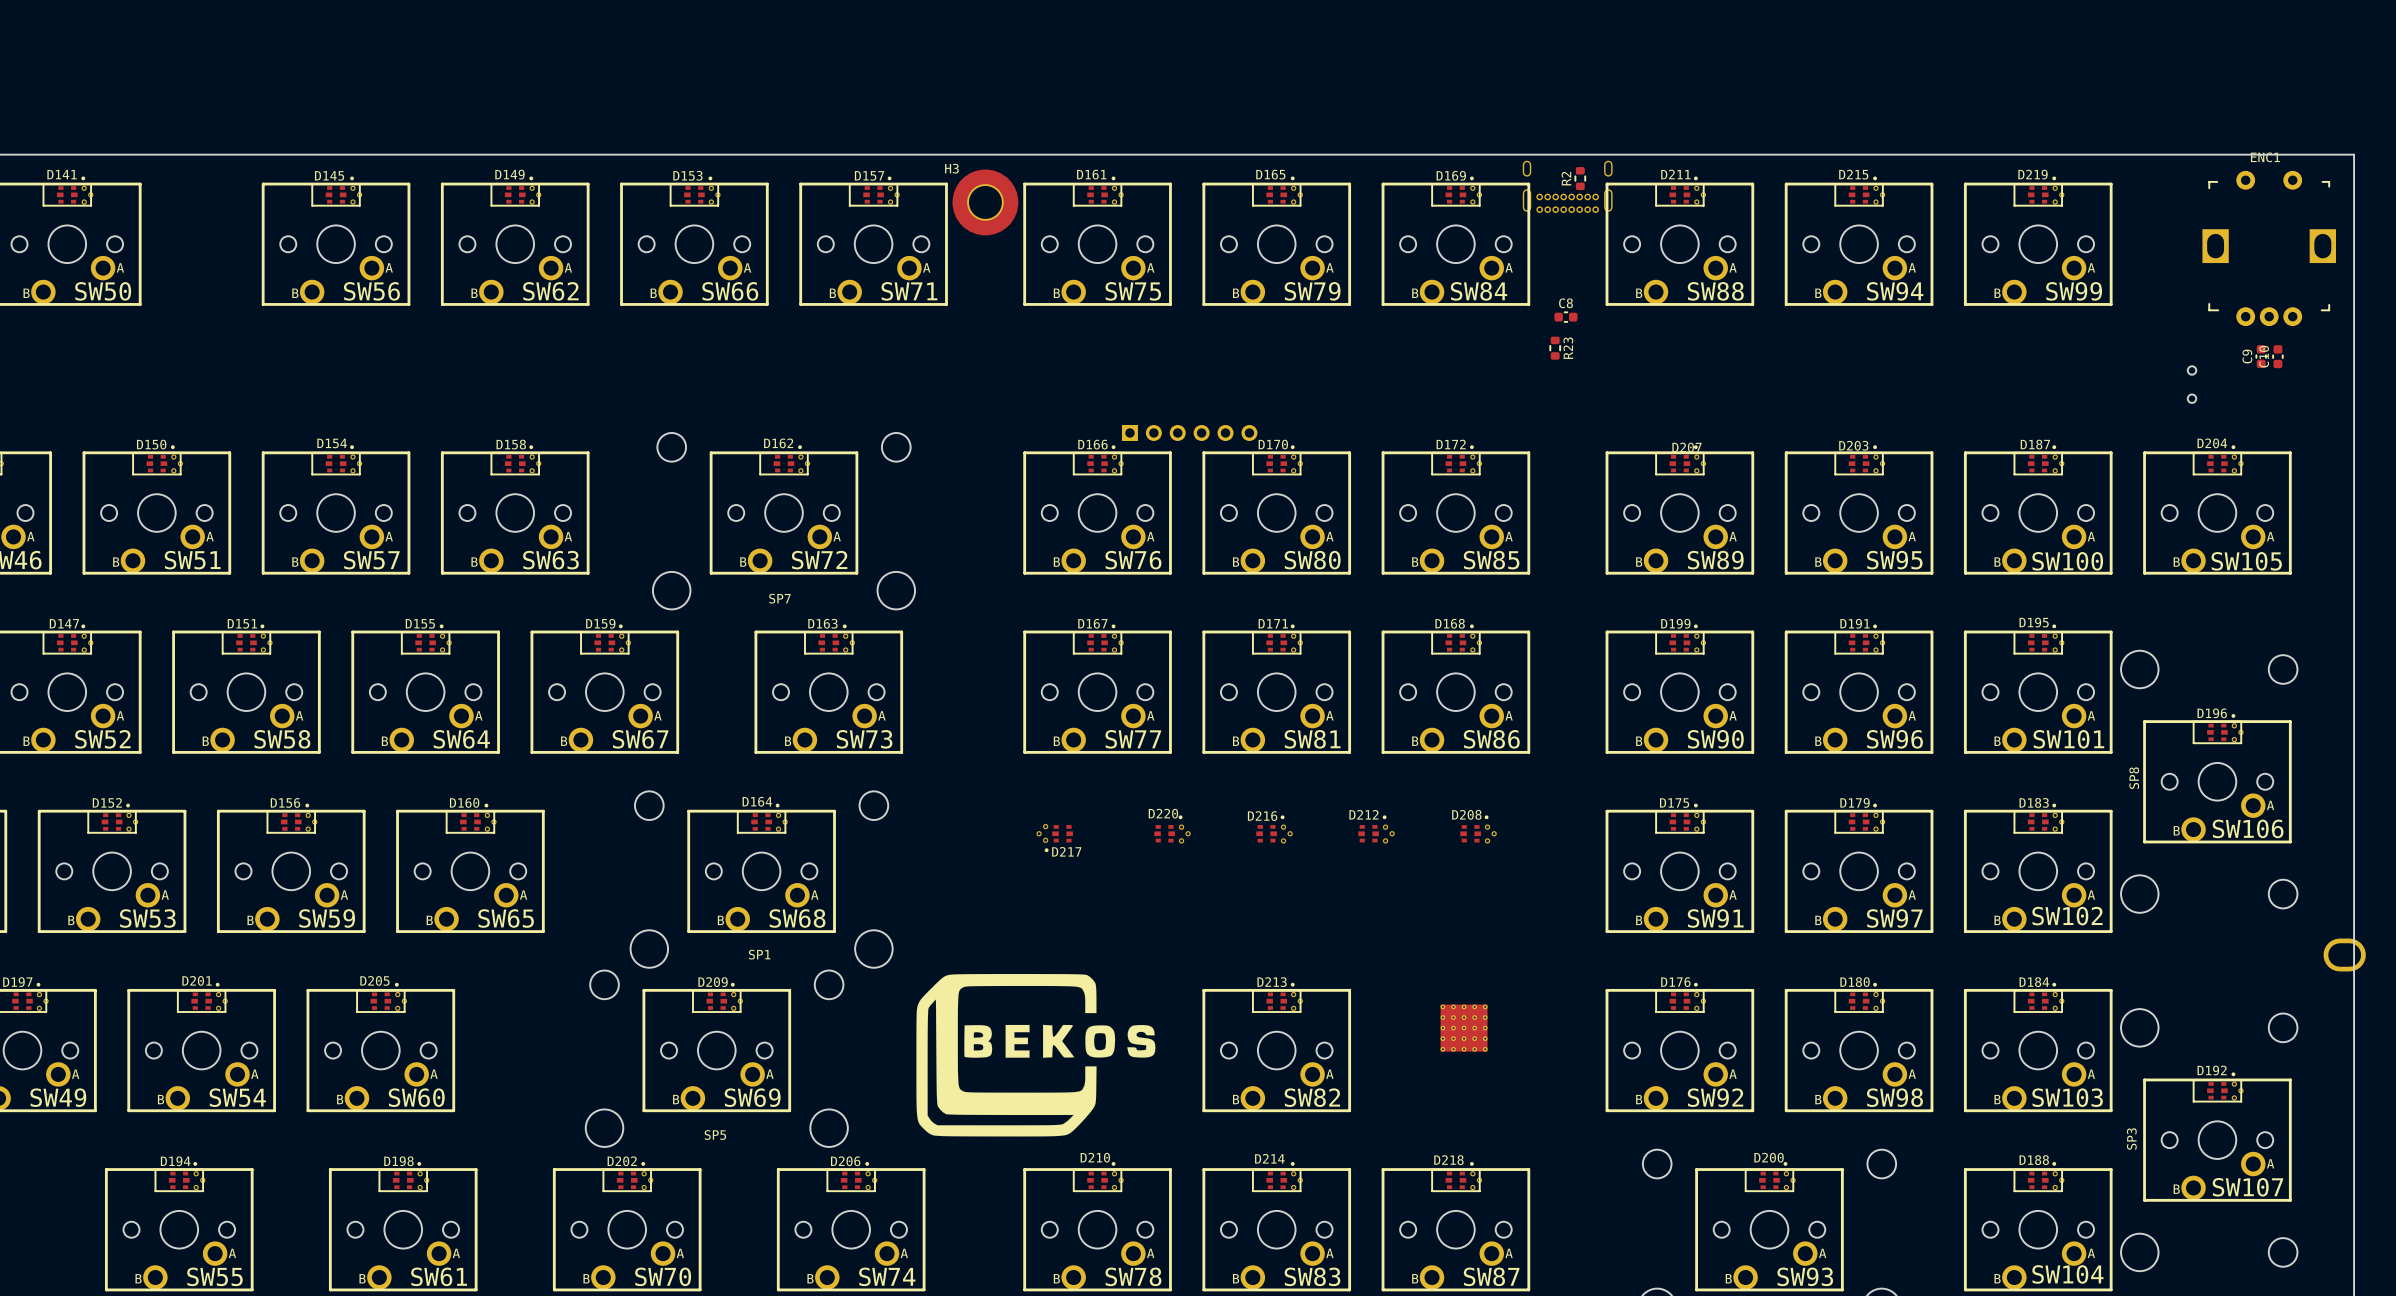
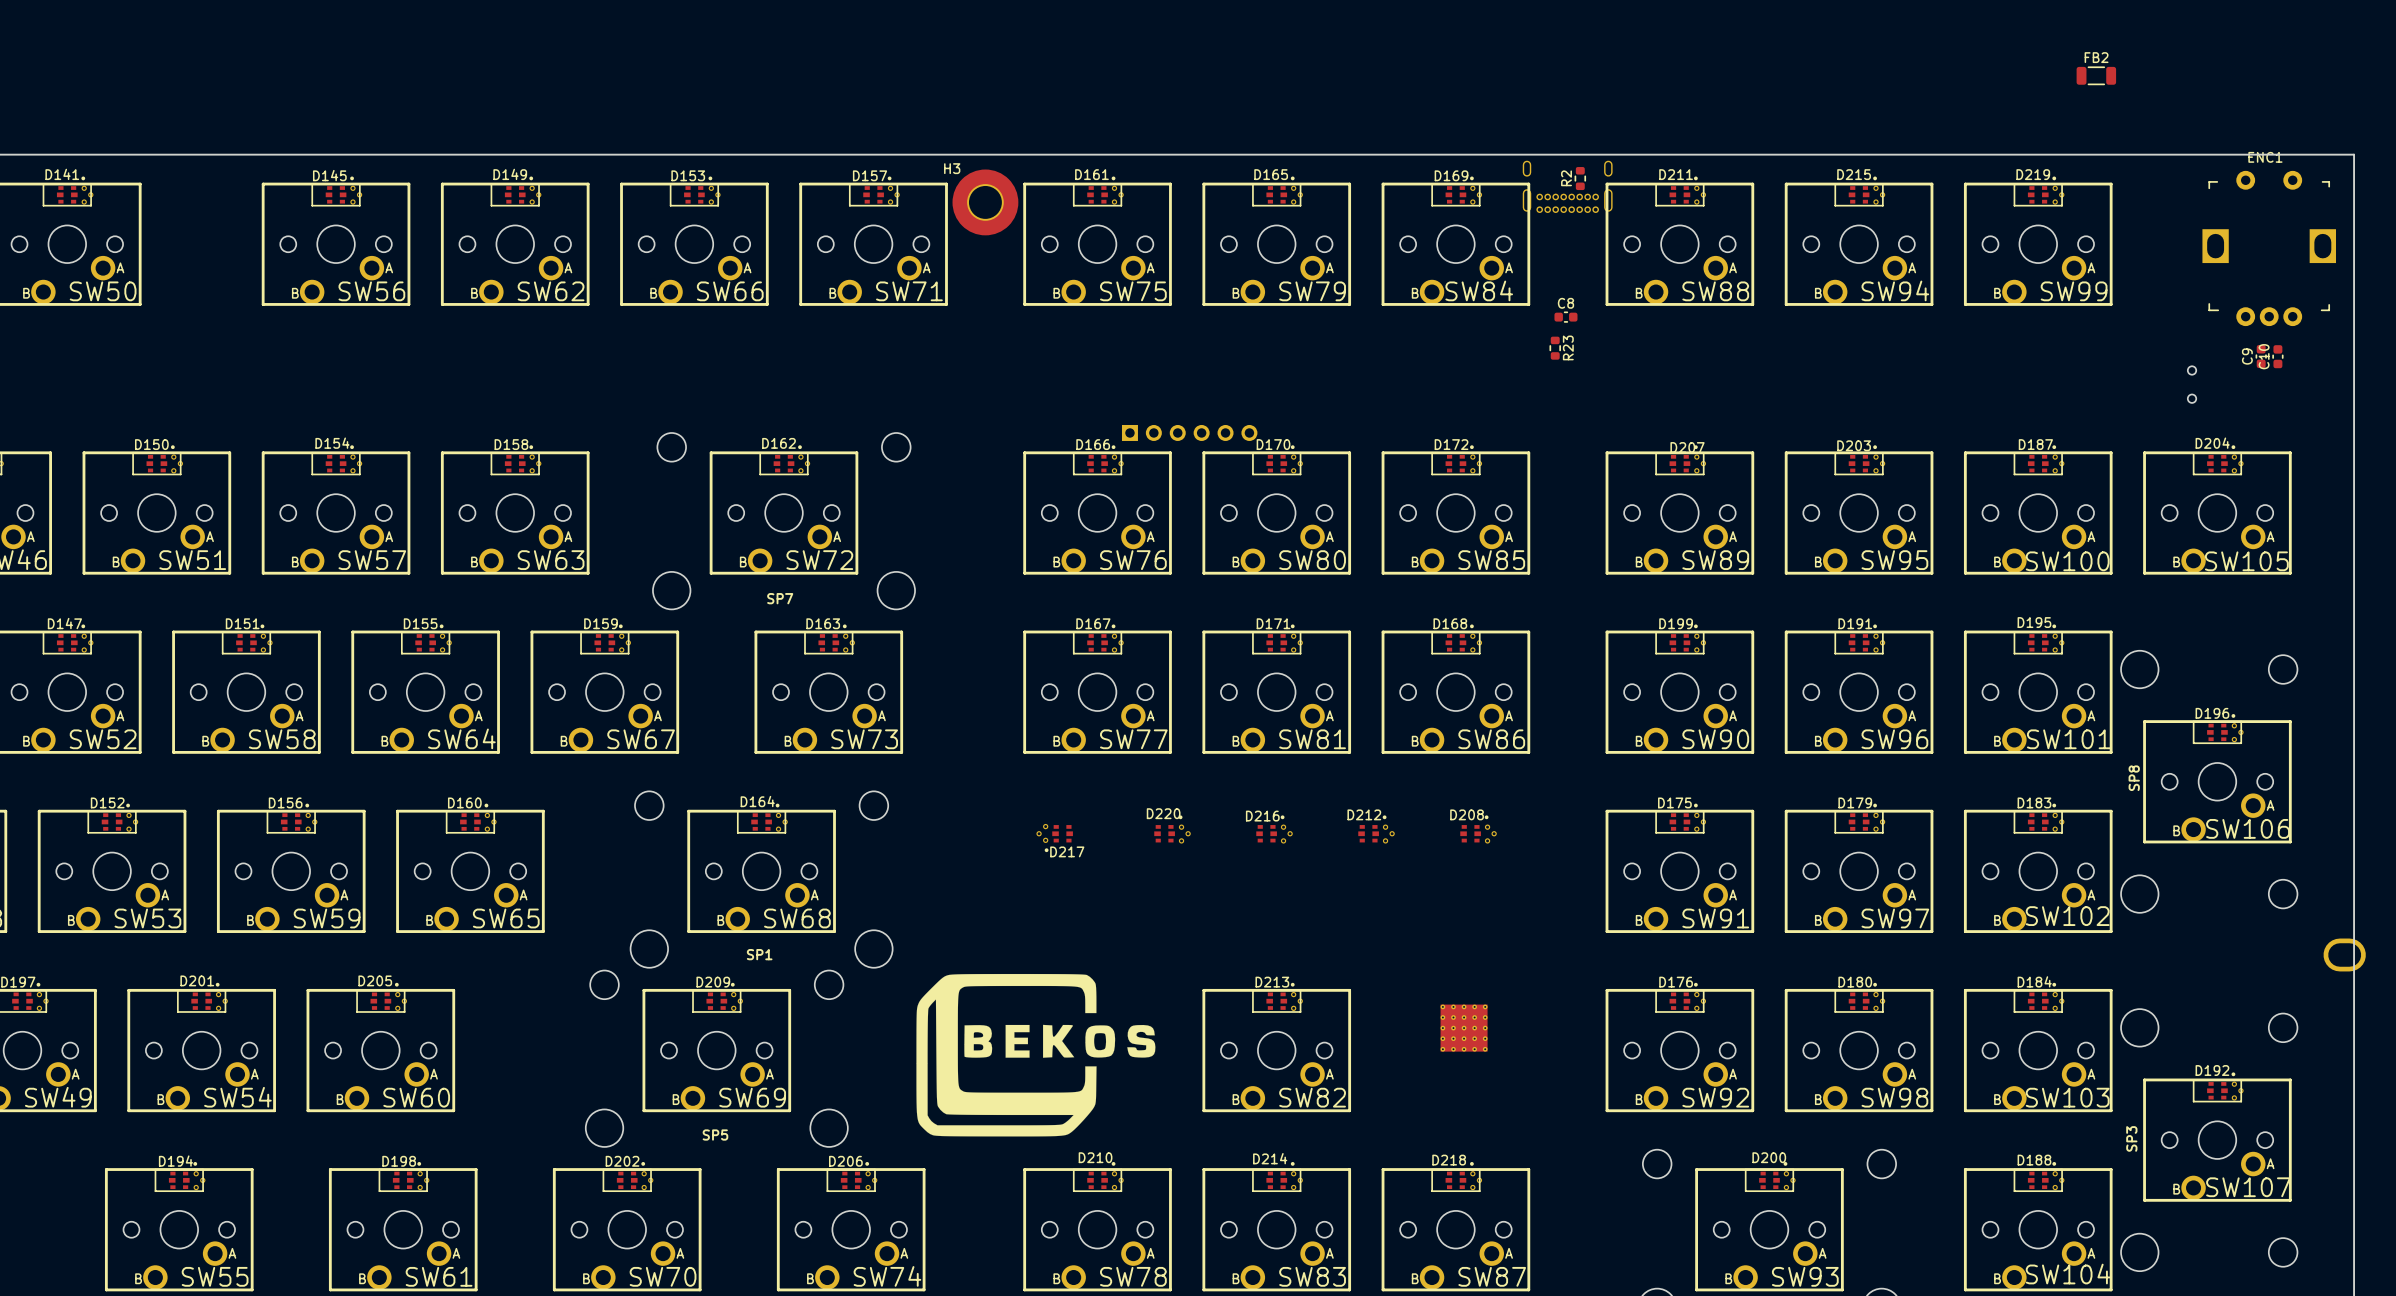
FB2: none -> (2096, 75)

